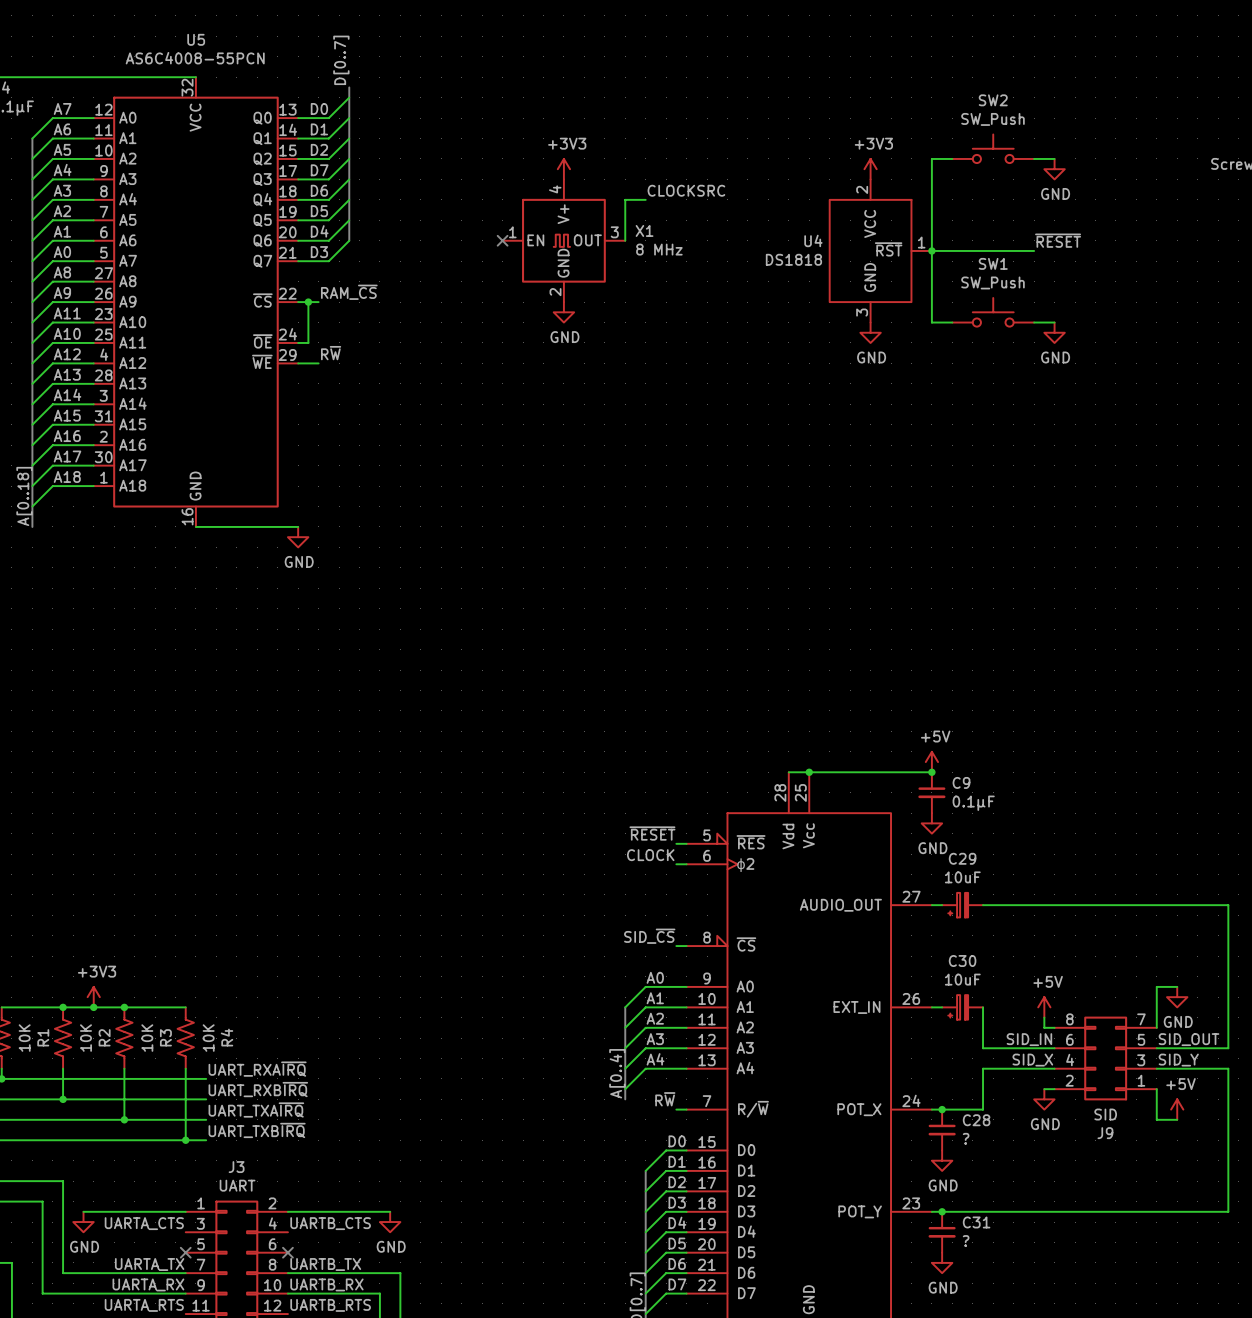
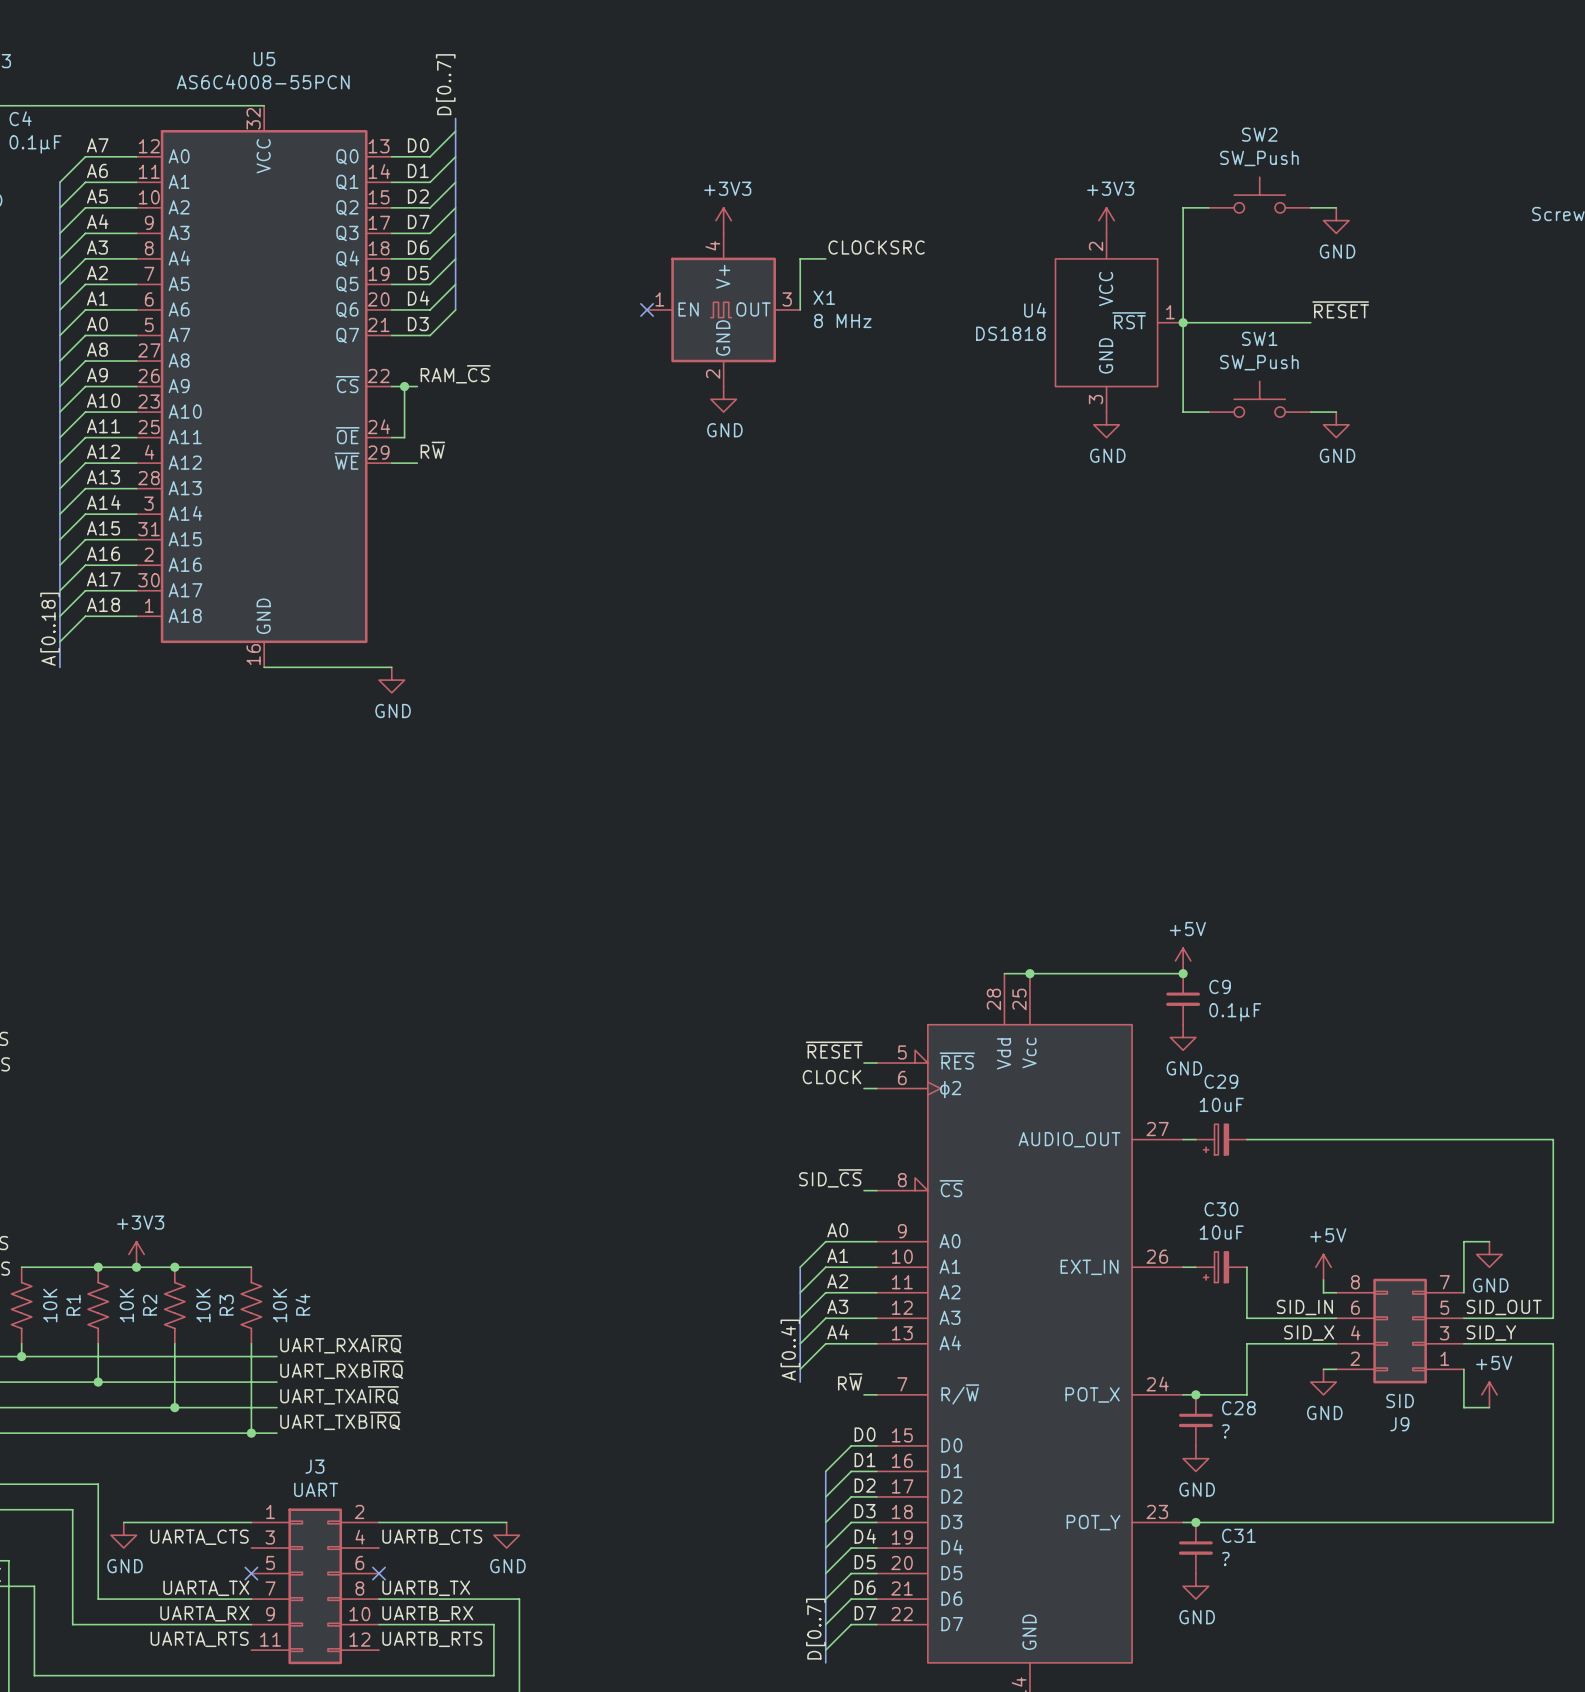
label: A11 (67, 313) -> A10 (103, 400)
label: A10 (67, 333) -> A11 (103, 426)

